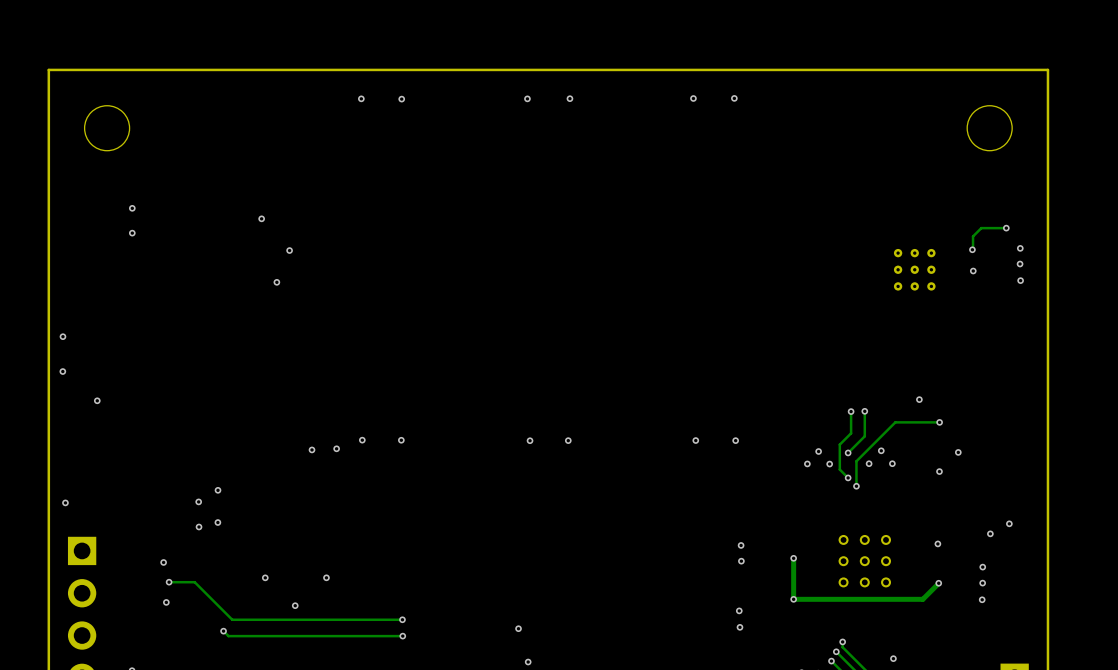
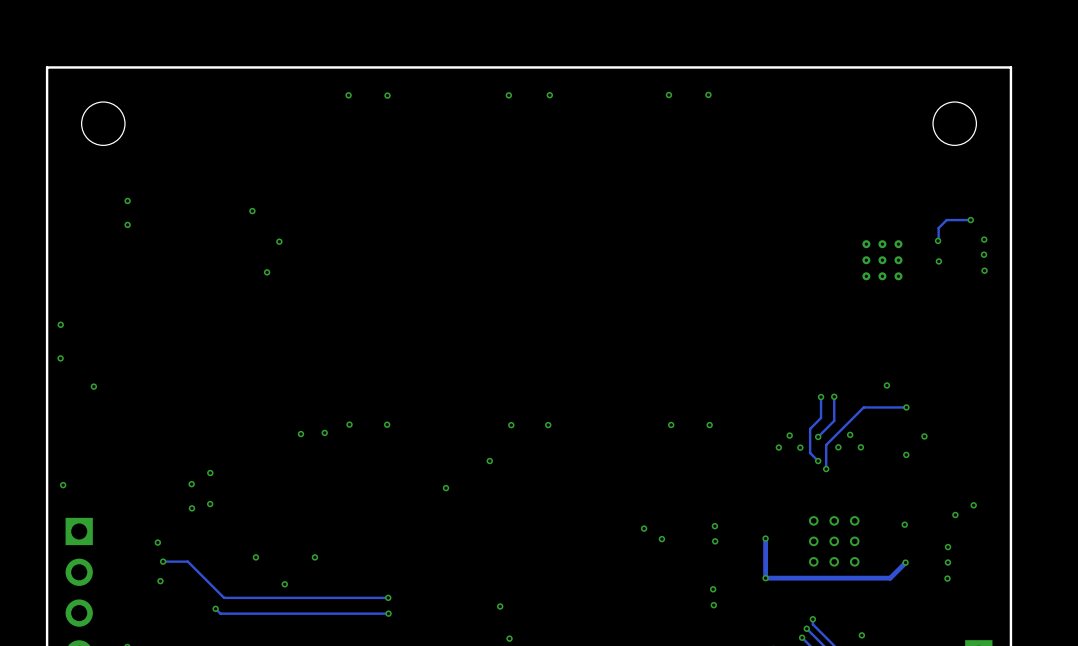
via: none -> (489, 461)
via: none -> (445, 488)
via: none -> (644, 528)
via: none -> (661, 539)

